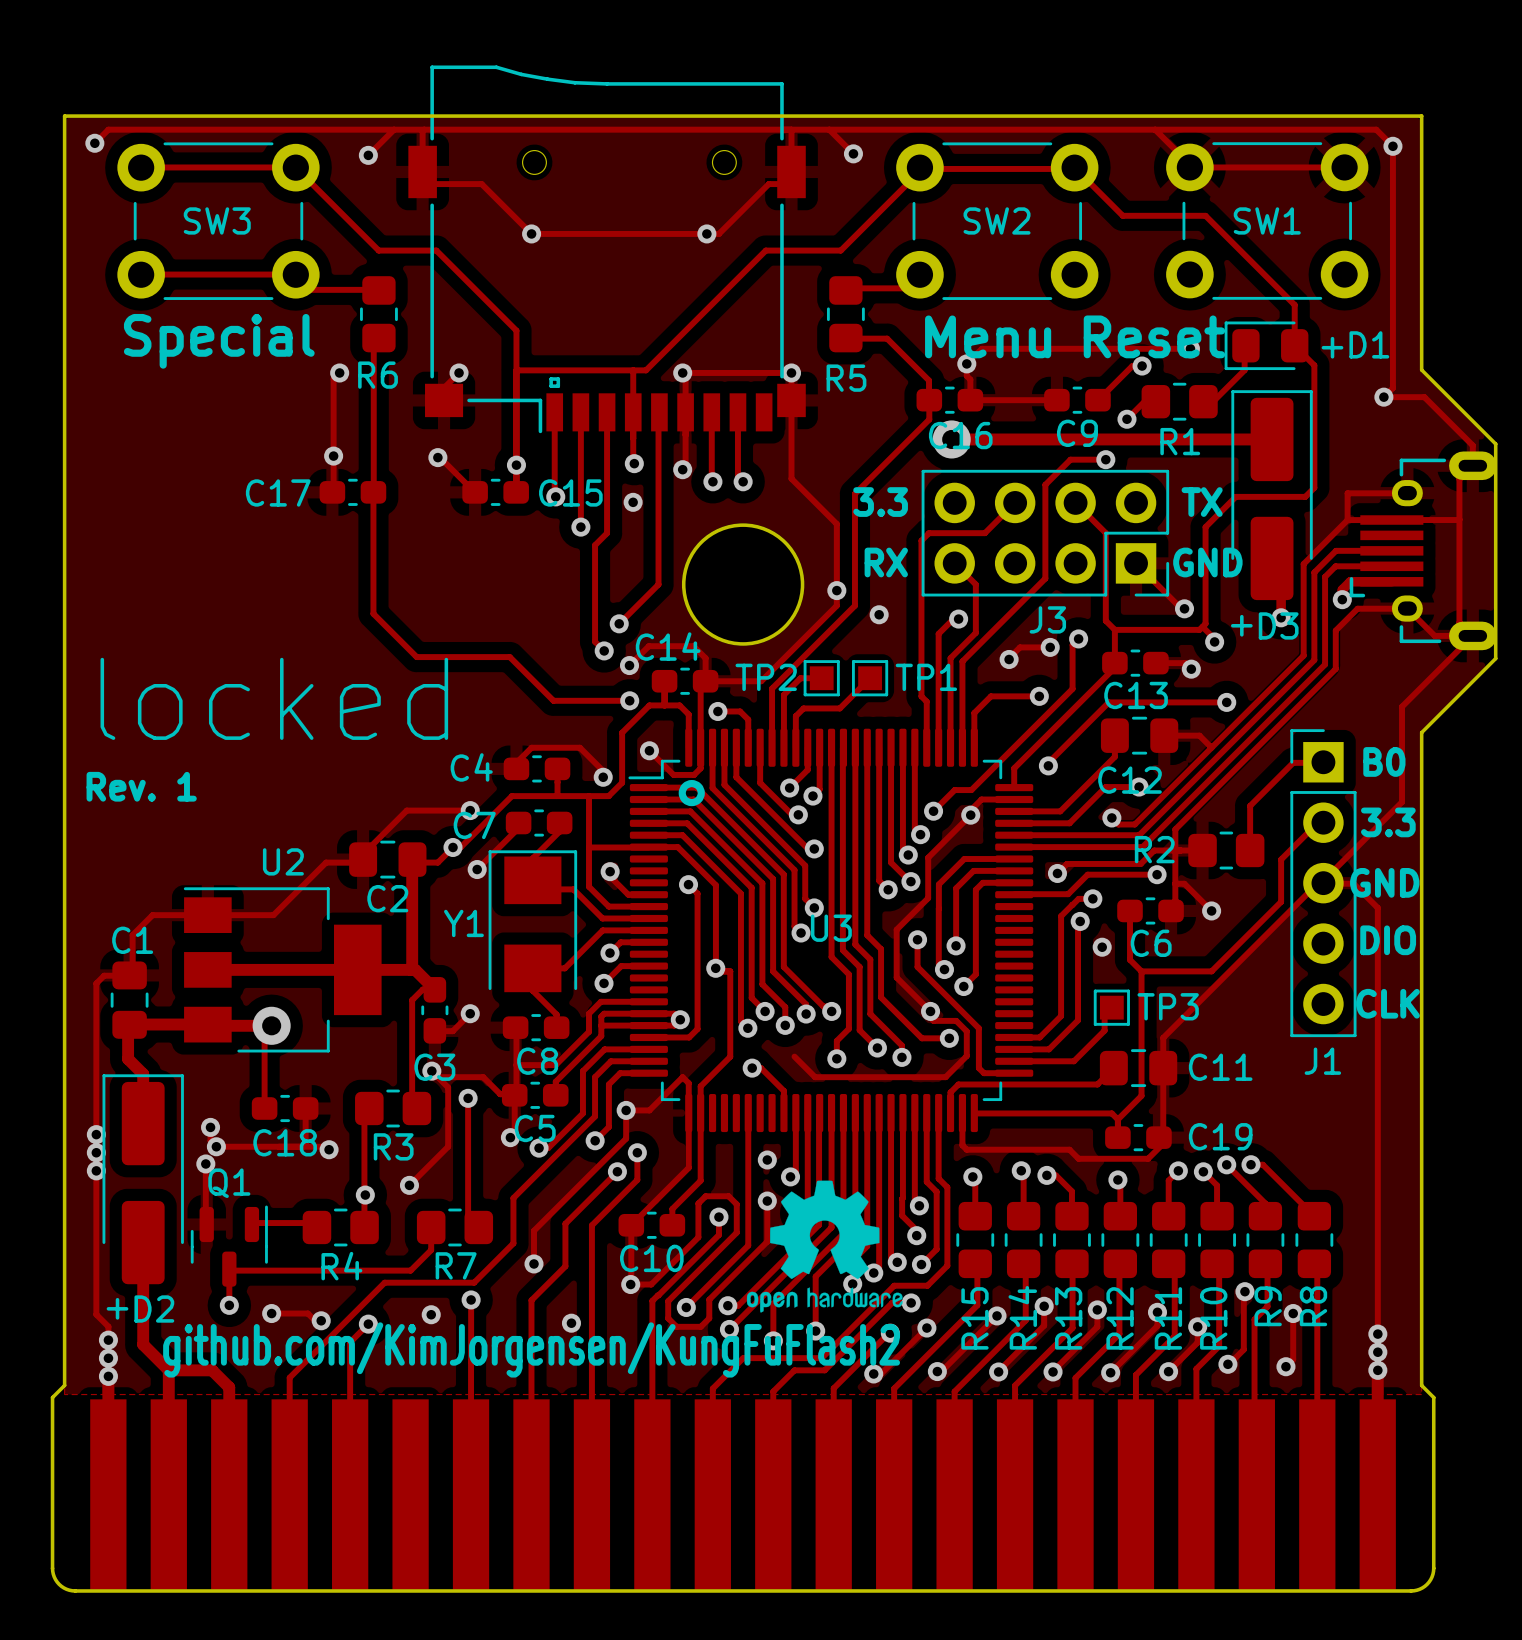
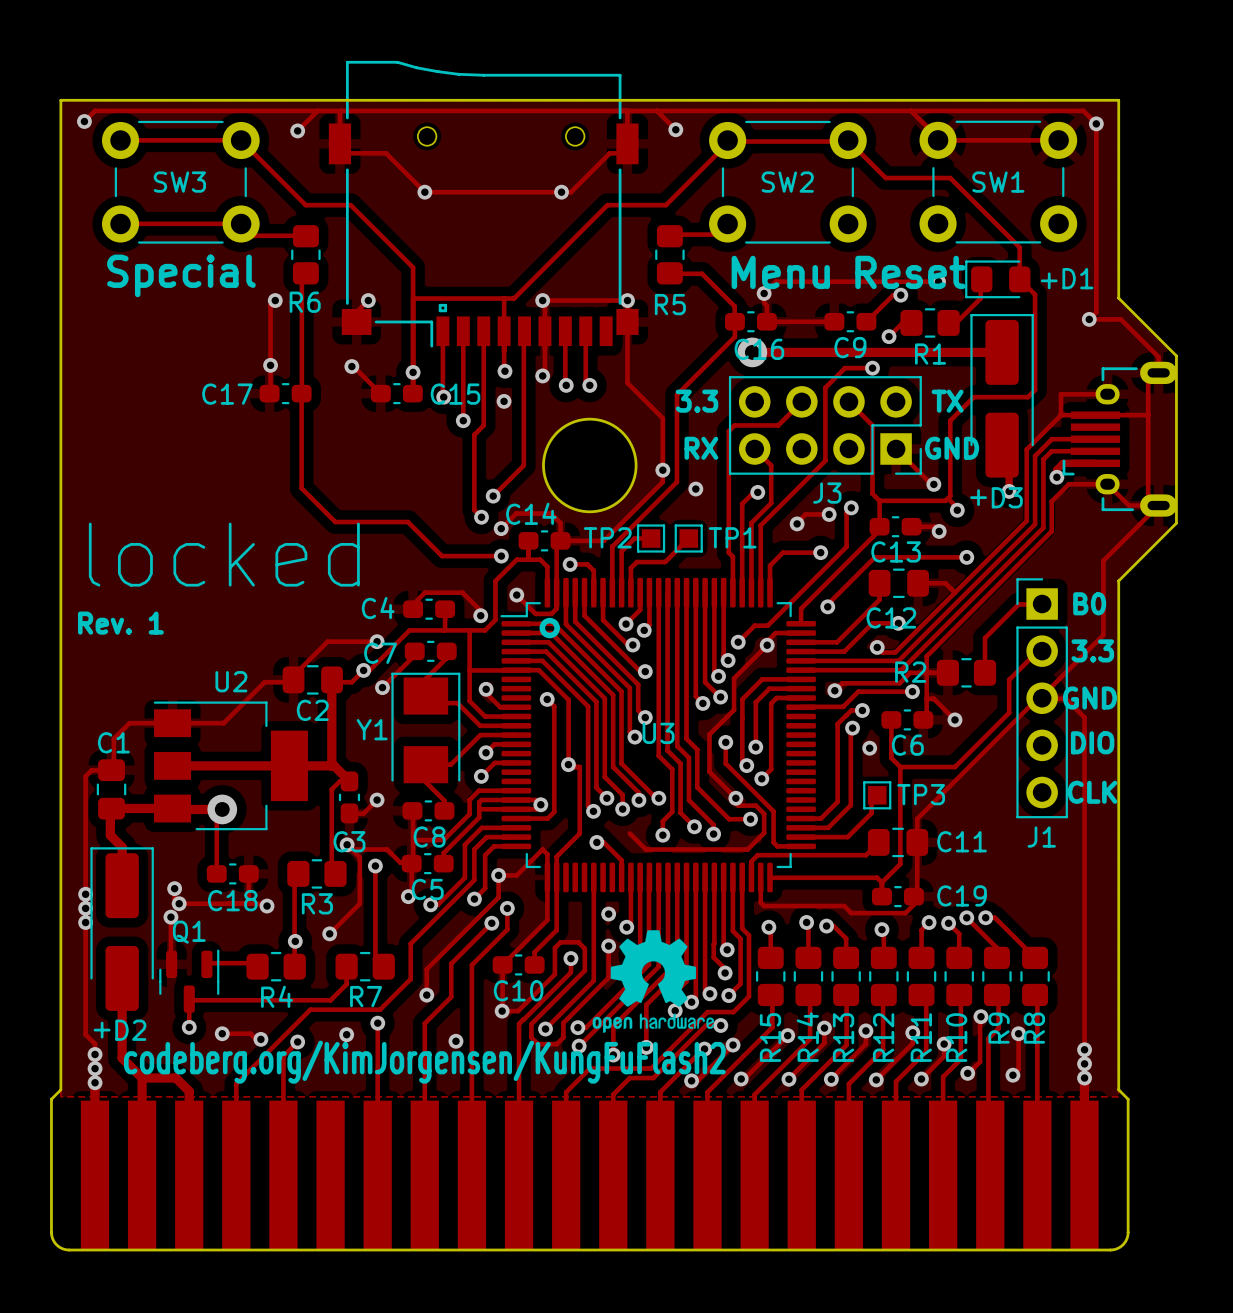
text: github.com/KimJorgensen/KungFuFlash2 (531, 1349) -> codeberg.org/KimJorgensen/KungFuFlash2 (424, 1062)

